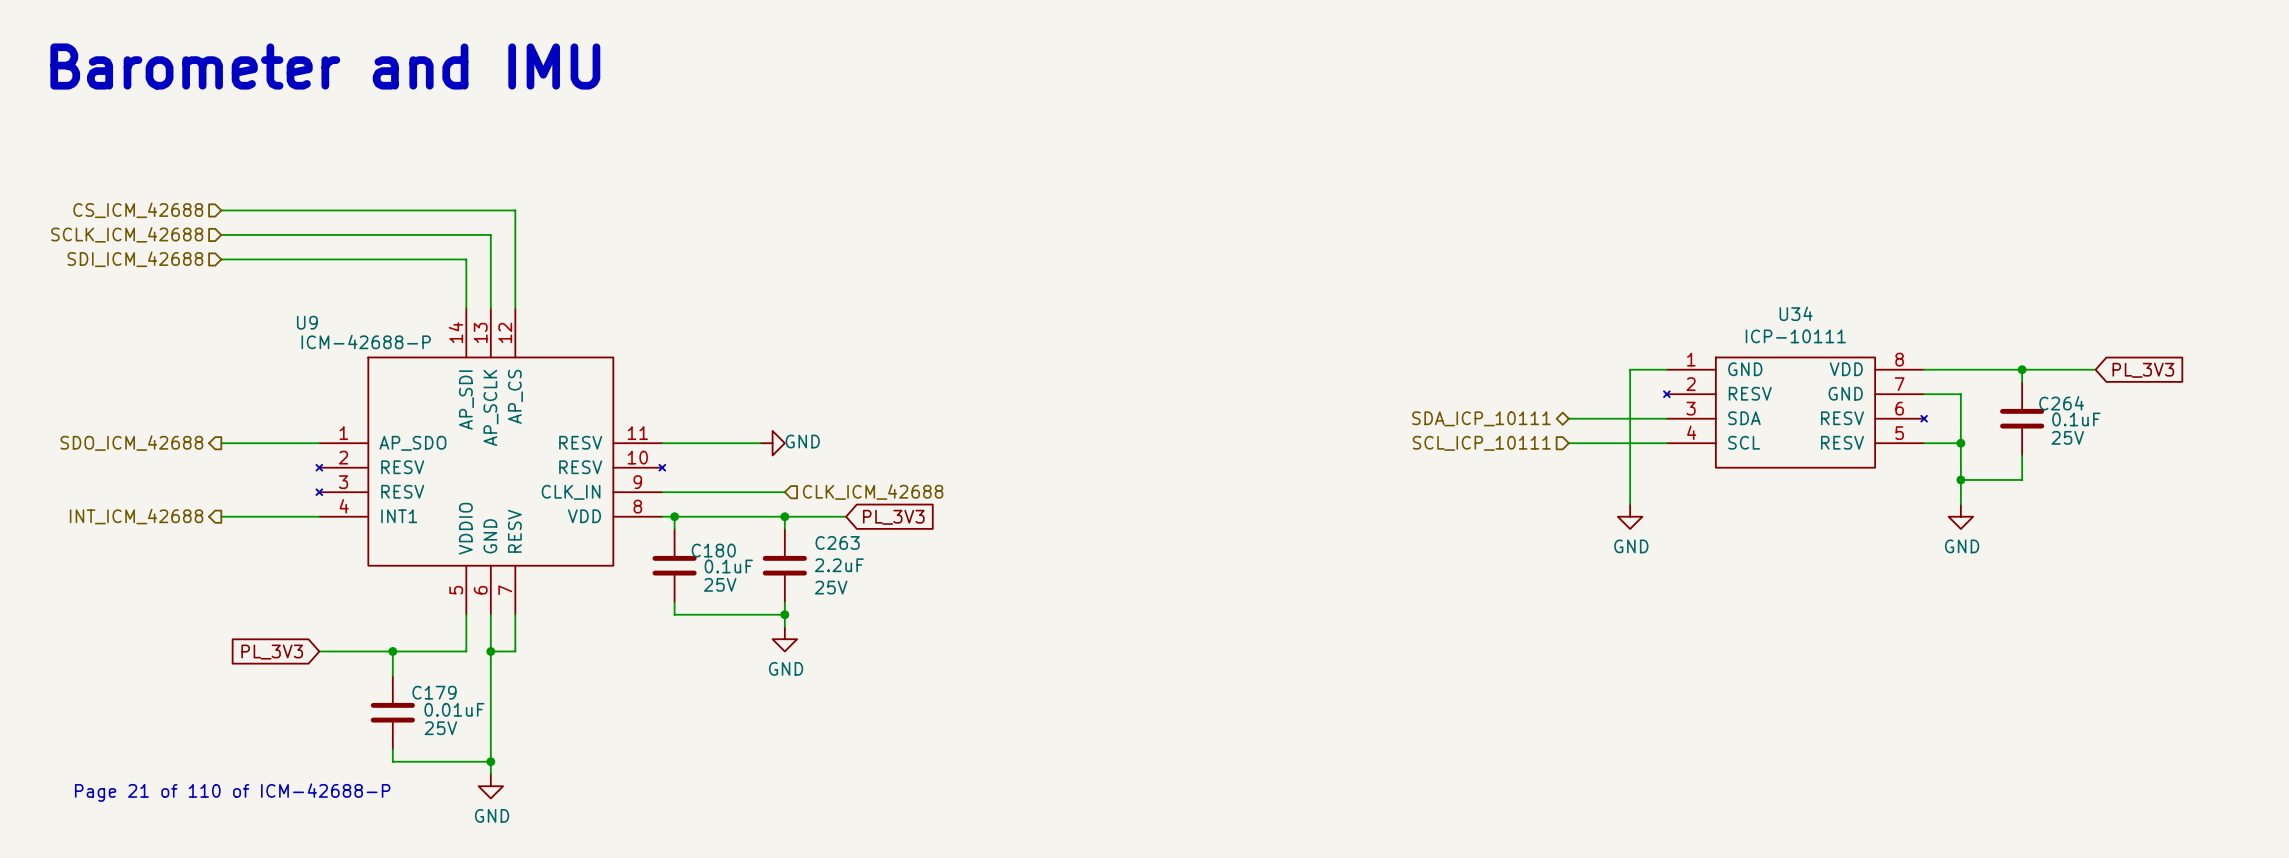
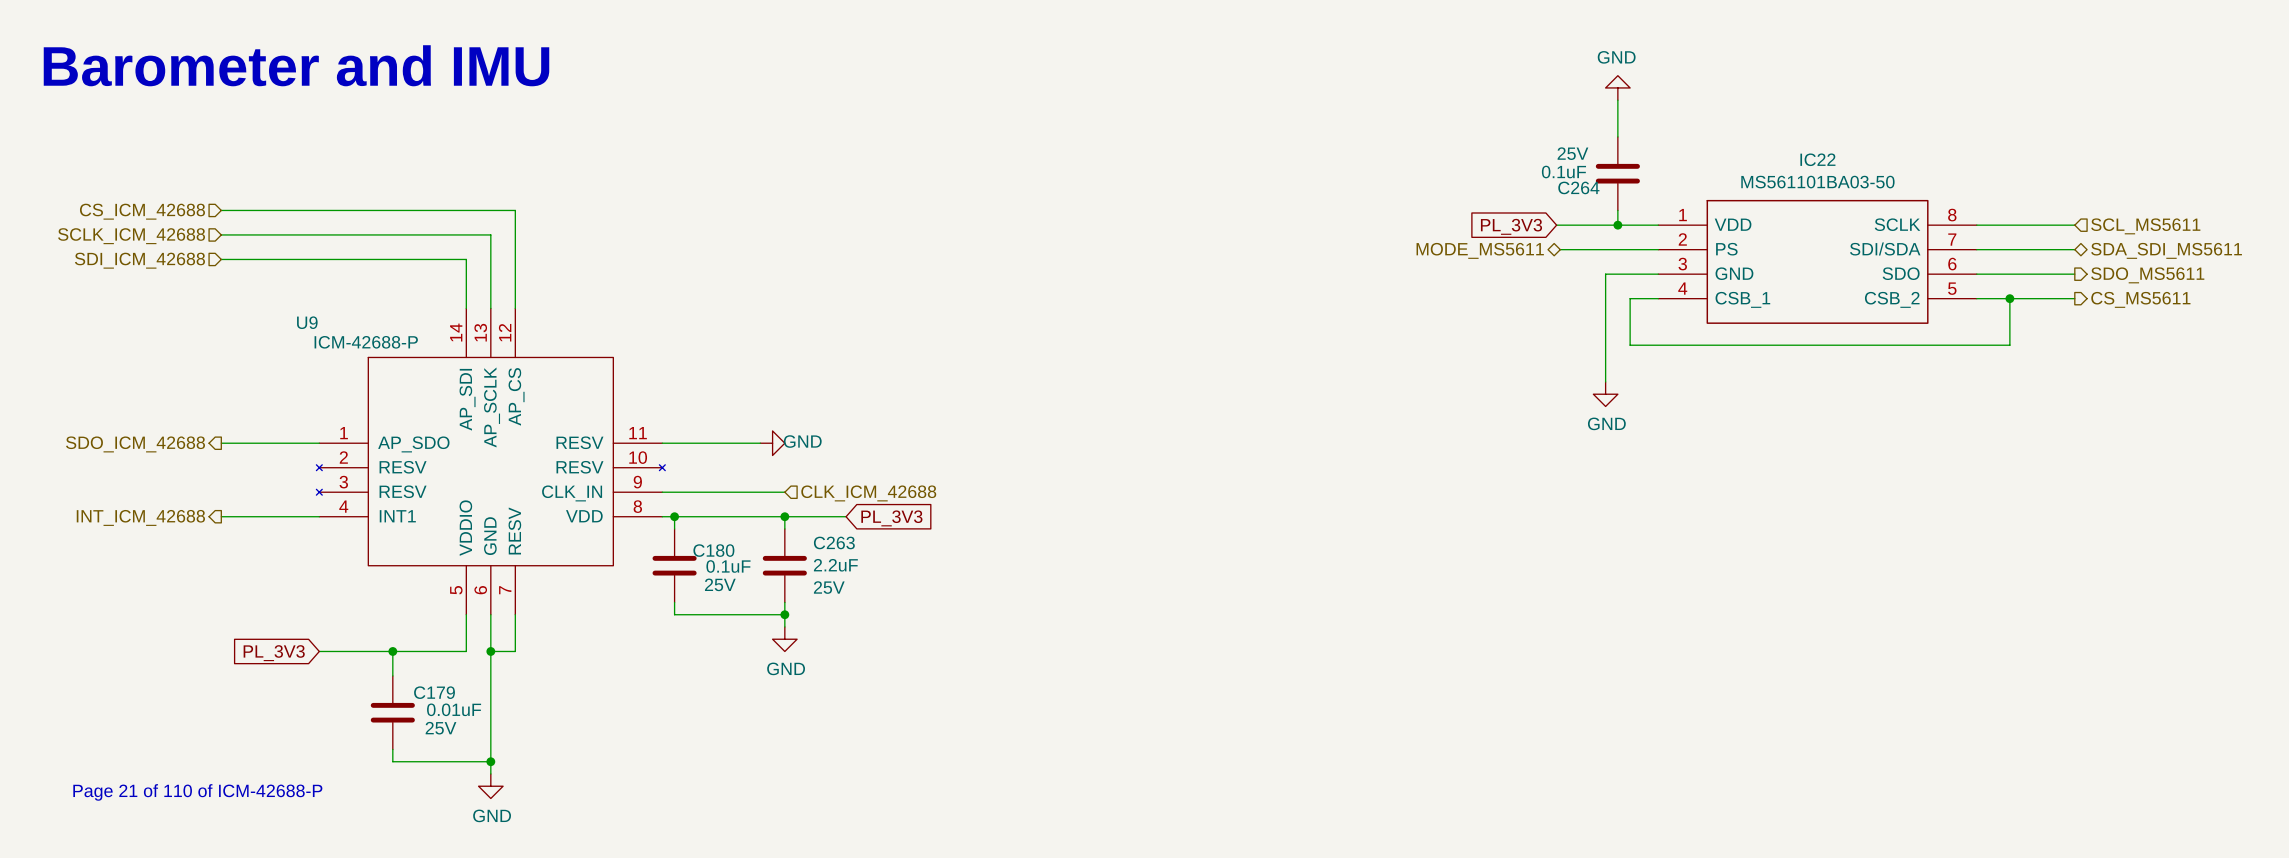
power symbol: none -> GND (1617, 87)
wire: none -> (1617, 100) (1617, 136)
wire: none -> (1617, 210) (1617, 225)
global label: none -> PL_3V3 (1511, 226)
wire: none -> (1556, 225) (1658, 225)
junction: none -> (1617, 225)
wire: none -> (1976, 225) (2074, 225)
hierarchical label: none -> SCL_MS5611 (2145, 226)
hierarchical label: none -> MODE_MS5611 (1480, 250)
wire: none -> (1976, 249) (2074, 249)
hierarchical label: none -> SDA_SDI_MS5611 (2166, 250)
IC22: none -> MS561101BA03-50 (1817, 261)
wire: none -> (1658, 274) (1605, 274) (1605, 381)
wire: none -> (1976, 274) (2074, 274)
hierarchical label: none -> SDO_MS5611 (2147, 275)
wire: none -> (1658, 298) (1630, 298) (1630, 345) (2009, 345) (2009, 298)
wire: none -> (1976, 298) (2074, 298)
junction: none -> (2009, 298)
hierarchical label: none -> CS_MS5611 (2140, 299)
wire: (1666, 369) (1630, 369) (1630, 504) -> none
wire: (1924, 369) (2095, 369) -> none
wire: (2022, 369) (2022, 381) -> none
junction: (2022, 369) -> none
global label: PL_3V3 (2143, 370) -> none
wire: (1924, 394) (1960, 394) (1960, 504) -> none
C264 name position: C264 (2061, 403) -> C264 (1578, 187)
U34: ICP-10111 (1795, 412) -> none
hierarchical label: SDA_ICP_10111 (1481, 418) -> none
wire: (1568, 418) (1666, 418) -> (1560, 249) (1658, 249)
C264 position: (2022, 418) -> (1617, 173)
C264 value position: 0.1uF (2076, 419) -> 0.1uF (1563, 172)
C264 text position: 25V (2067, 437) -> 25V (1572, 153)
hierarchical label: SCL_ICP_10111 (1481, 443) -> none
wire: (1568, 443) (1666, 443) -> none
wire: (1924, 443) (1960, 443) -> none
junction: (1960, 443) -> none
wire: (2022, 455) (2022, 479) (1960, 479) -> none
junction: (1960, 479) -> none
power symbol position: GND (1630, 516) -> GND (1605, 394)
power symbol: GND (1960, 516) -> none

